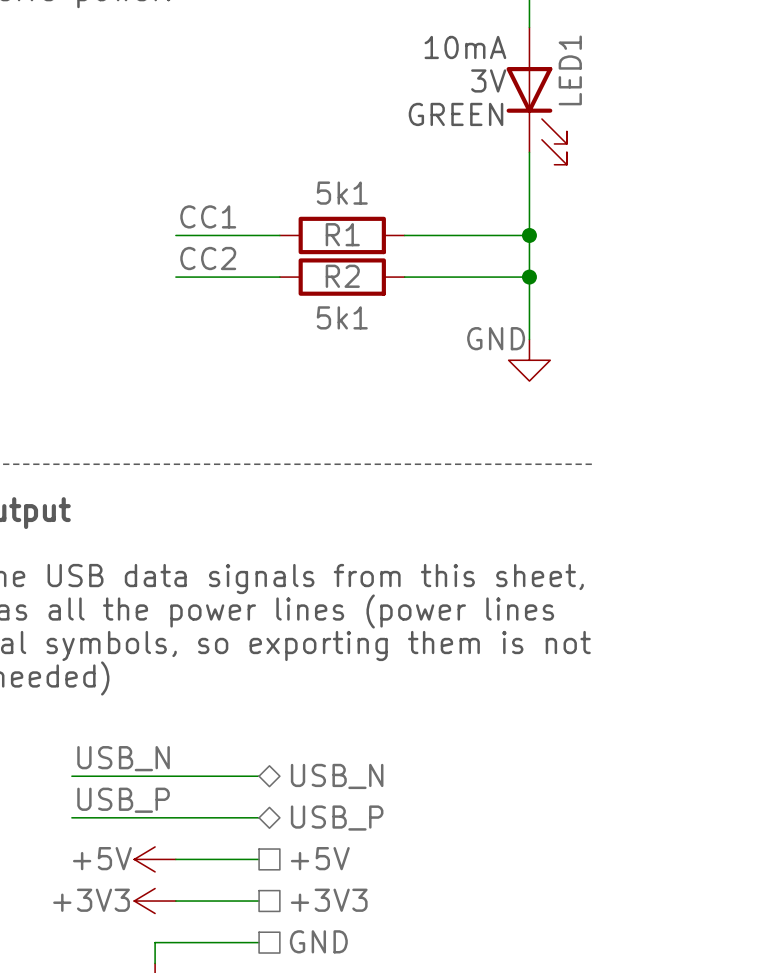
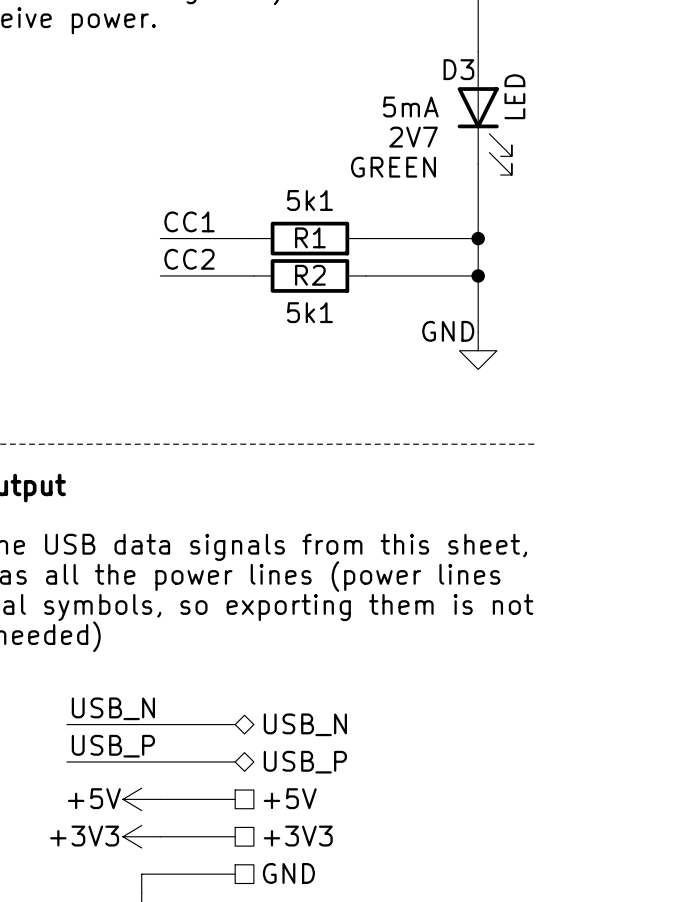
text: 10mA (465, 47) -> none
LED1 name: LED1 (570, 70) -> D3 (458, 69)
LED1 value: none -> LED (514, 96)
text: 3V (488, 80) -> none
text: none -> 5mA (410, 106)
text position: GREEN (456, 114) -> GREEN (393, 167)
text: none -> 2V7 (413, 137)

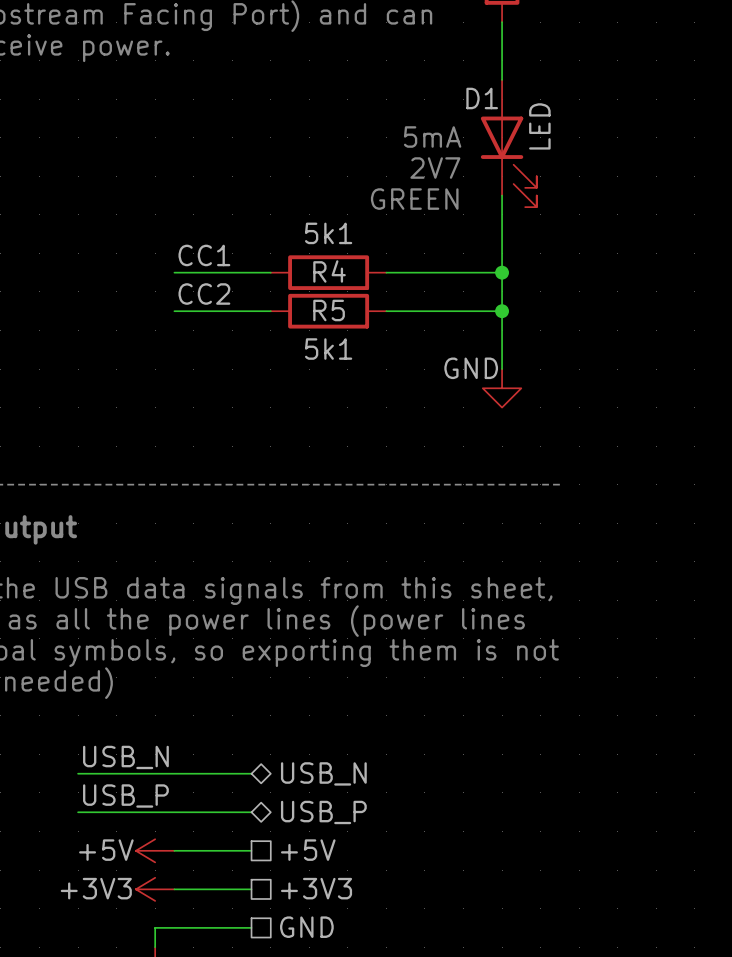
D3 name: D3 (458, 69) -> D1 (482, 98)
R1 name: R1 (310, 237) -> R4 (329, 271)
R2 name: R2 (310, 275) -> R5 (329, 310)

